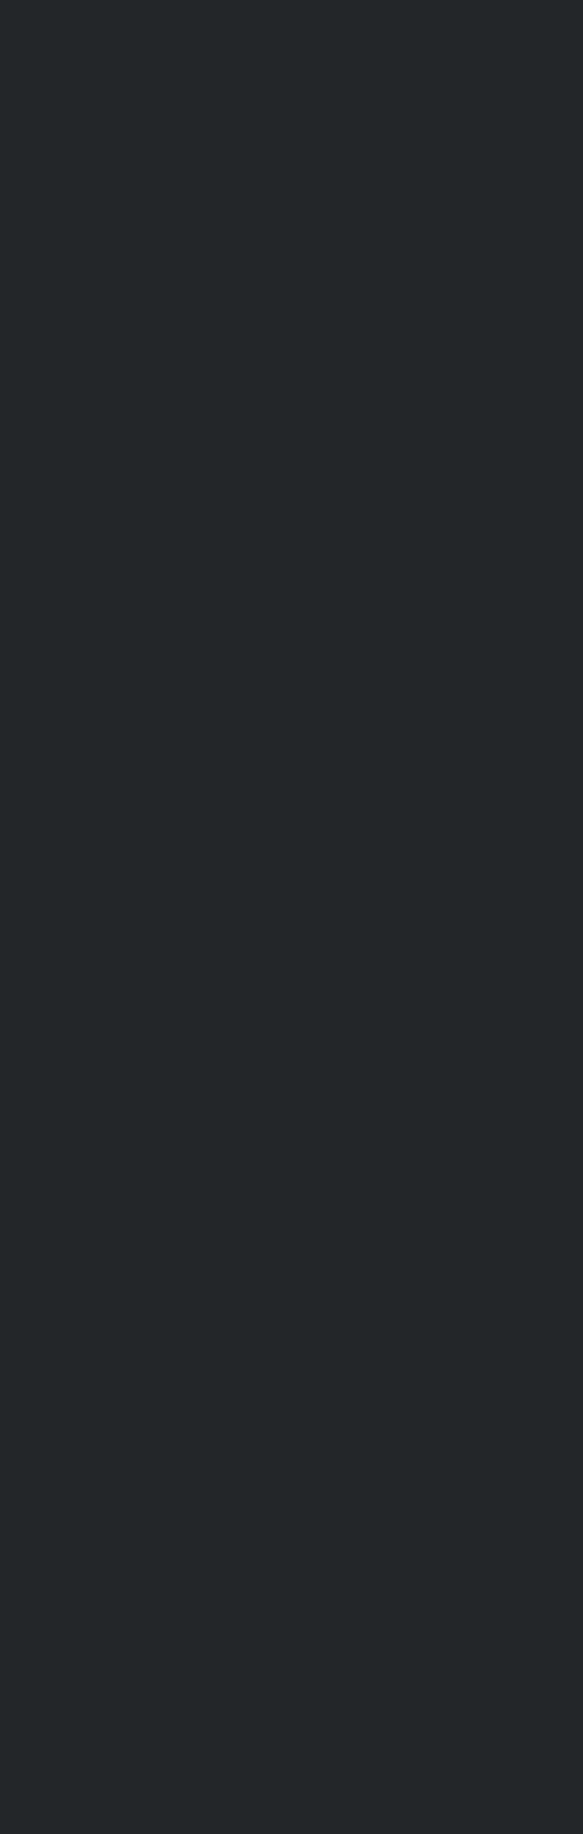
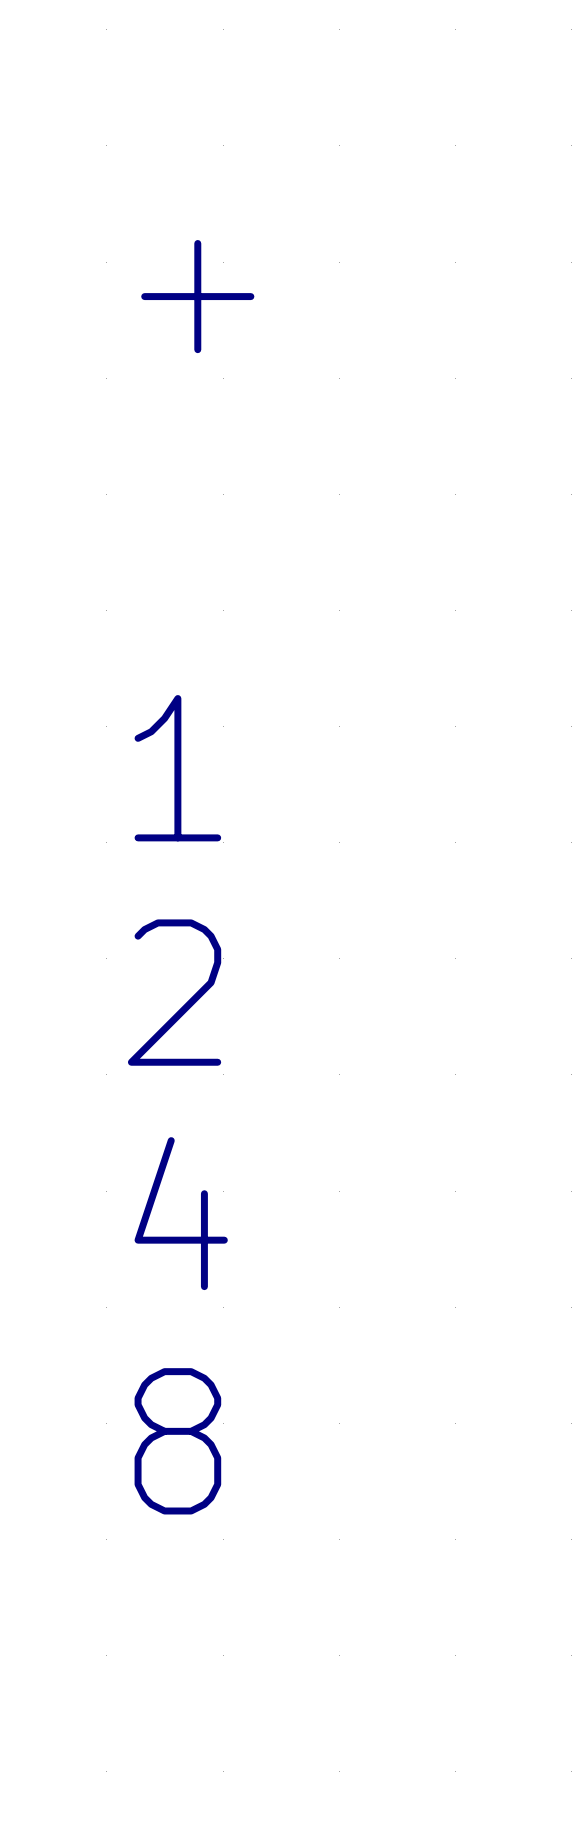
text: none -> + (197, 296)
text: none -> 1 (177, 768)
text: none -> 2 (174, 992)
text: none -> 4 (181, 1213)
text: none -> 8 (177, 1441)

